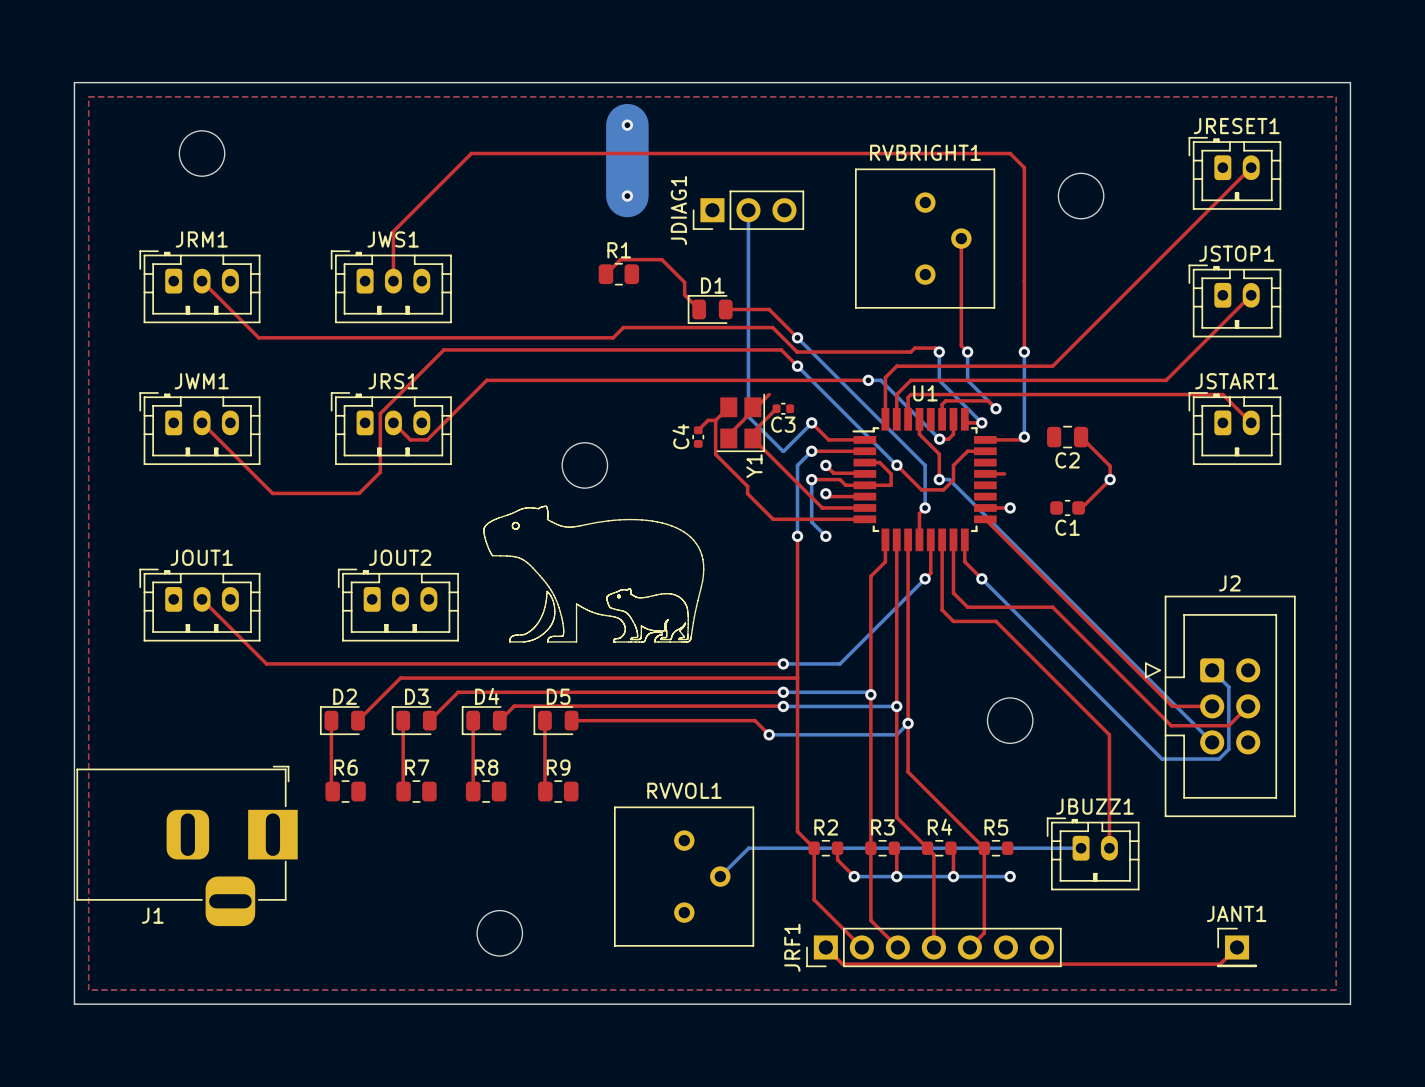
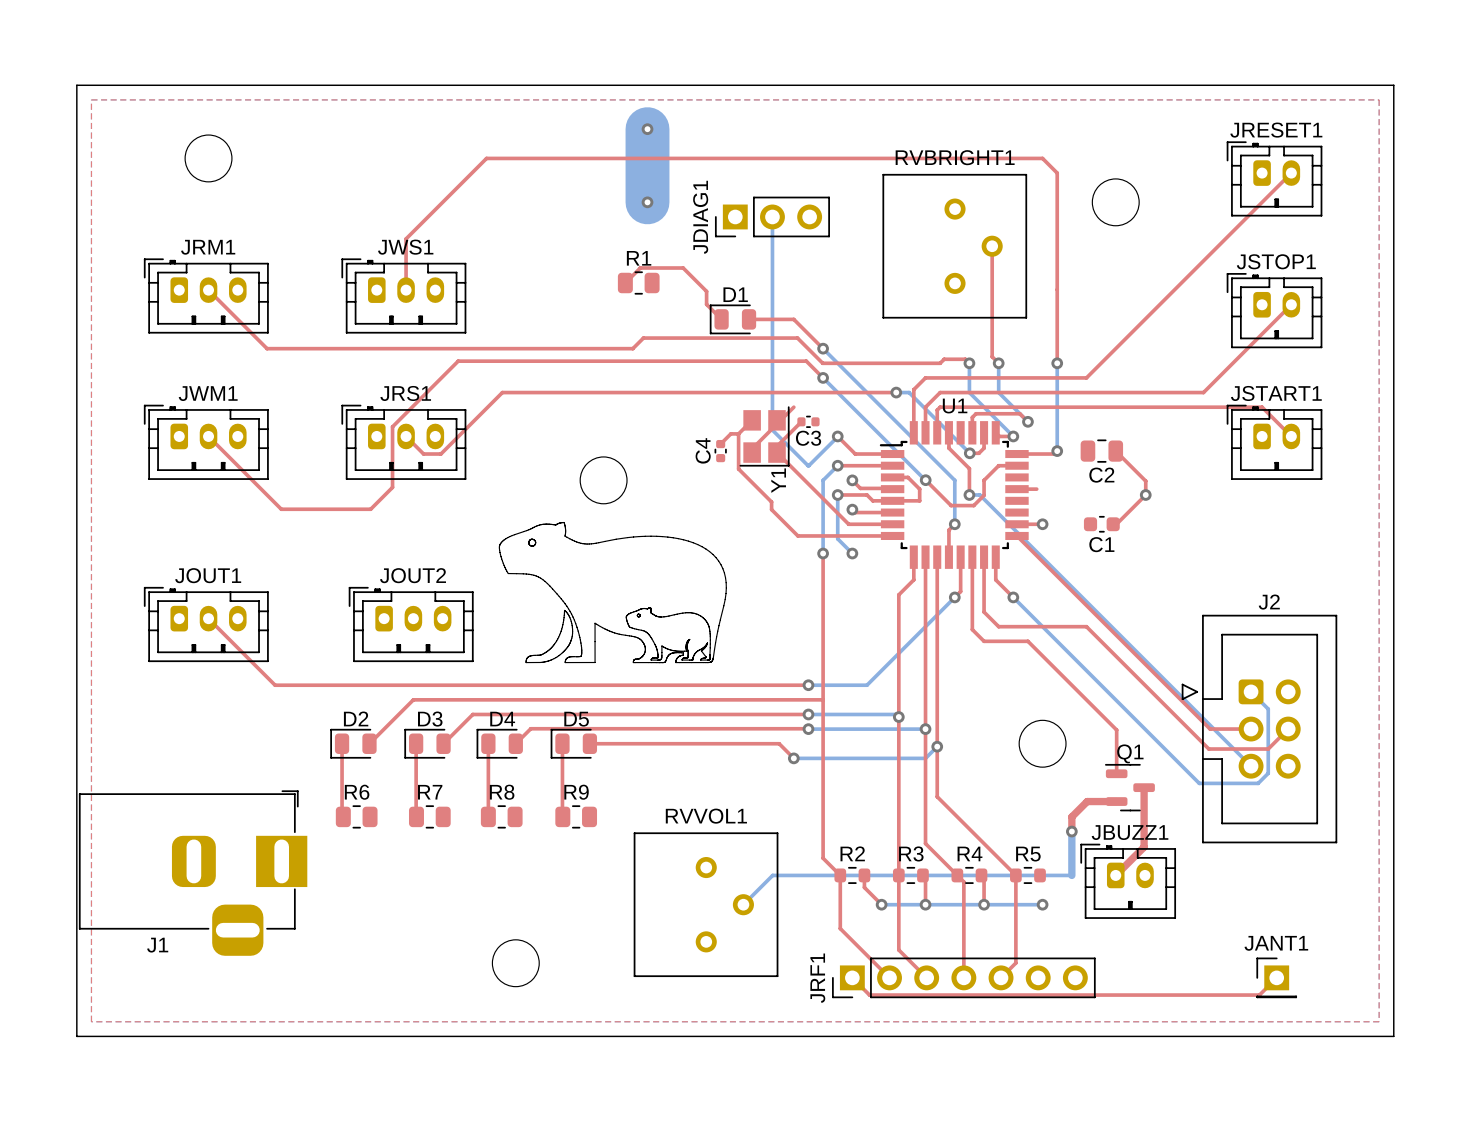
top track: (1081, 707) (1109, 734) (1109, 848) -> (1116, 730) (1116, 773)
Q1: none -> (1129, 787)
top track: none -> (1144, 787) (1144, 847) (1115, 875)
top track: none -> (1116, 801) (1087, 801) (1071, 816) (1071, 831)
via: none -> (1071, 831)
bottom track: (1038, 848) (1081, 848) -> (1071, 875) (1071, 831)

